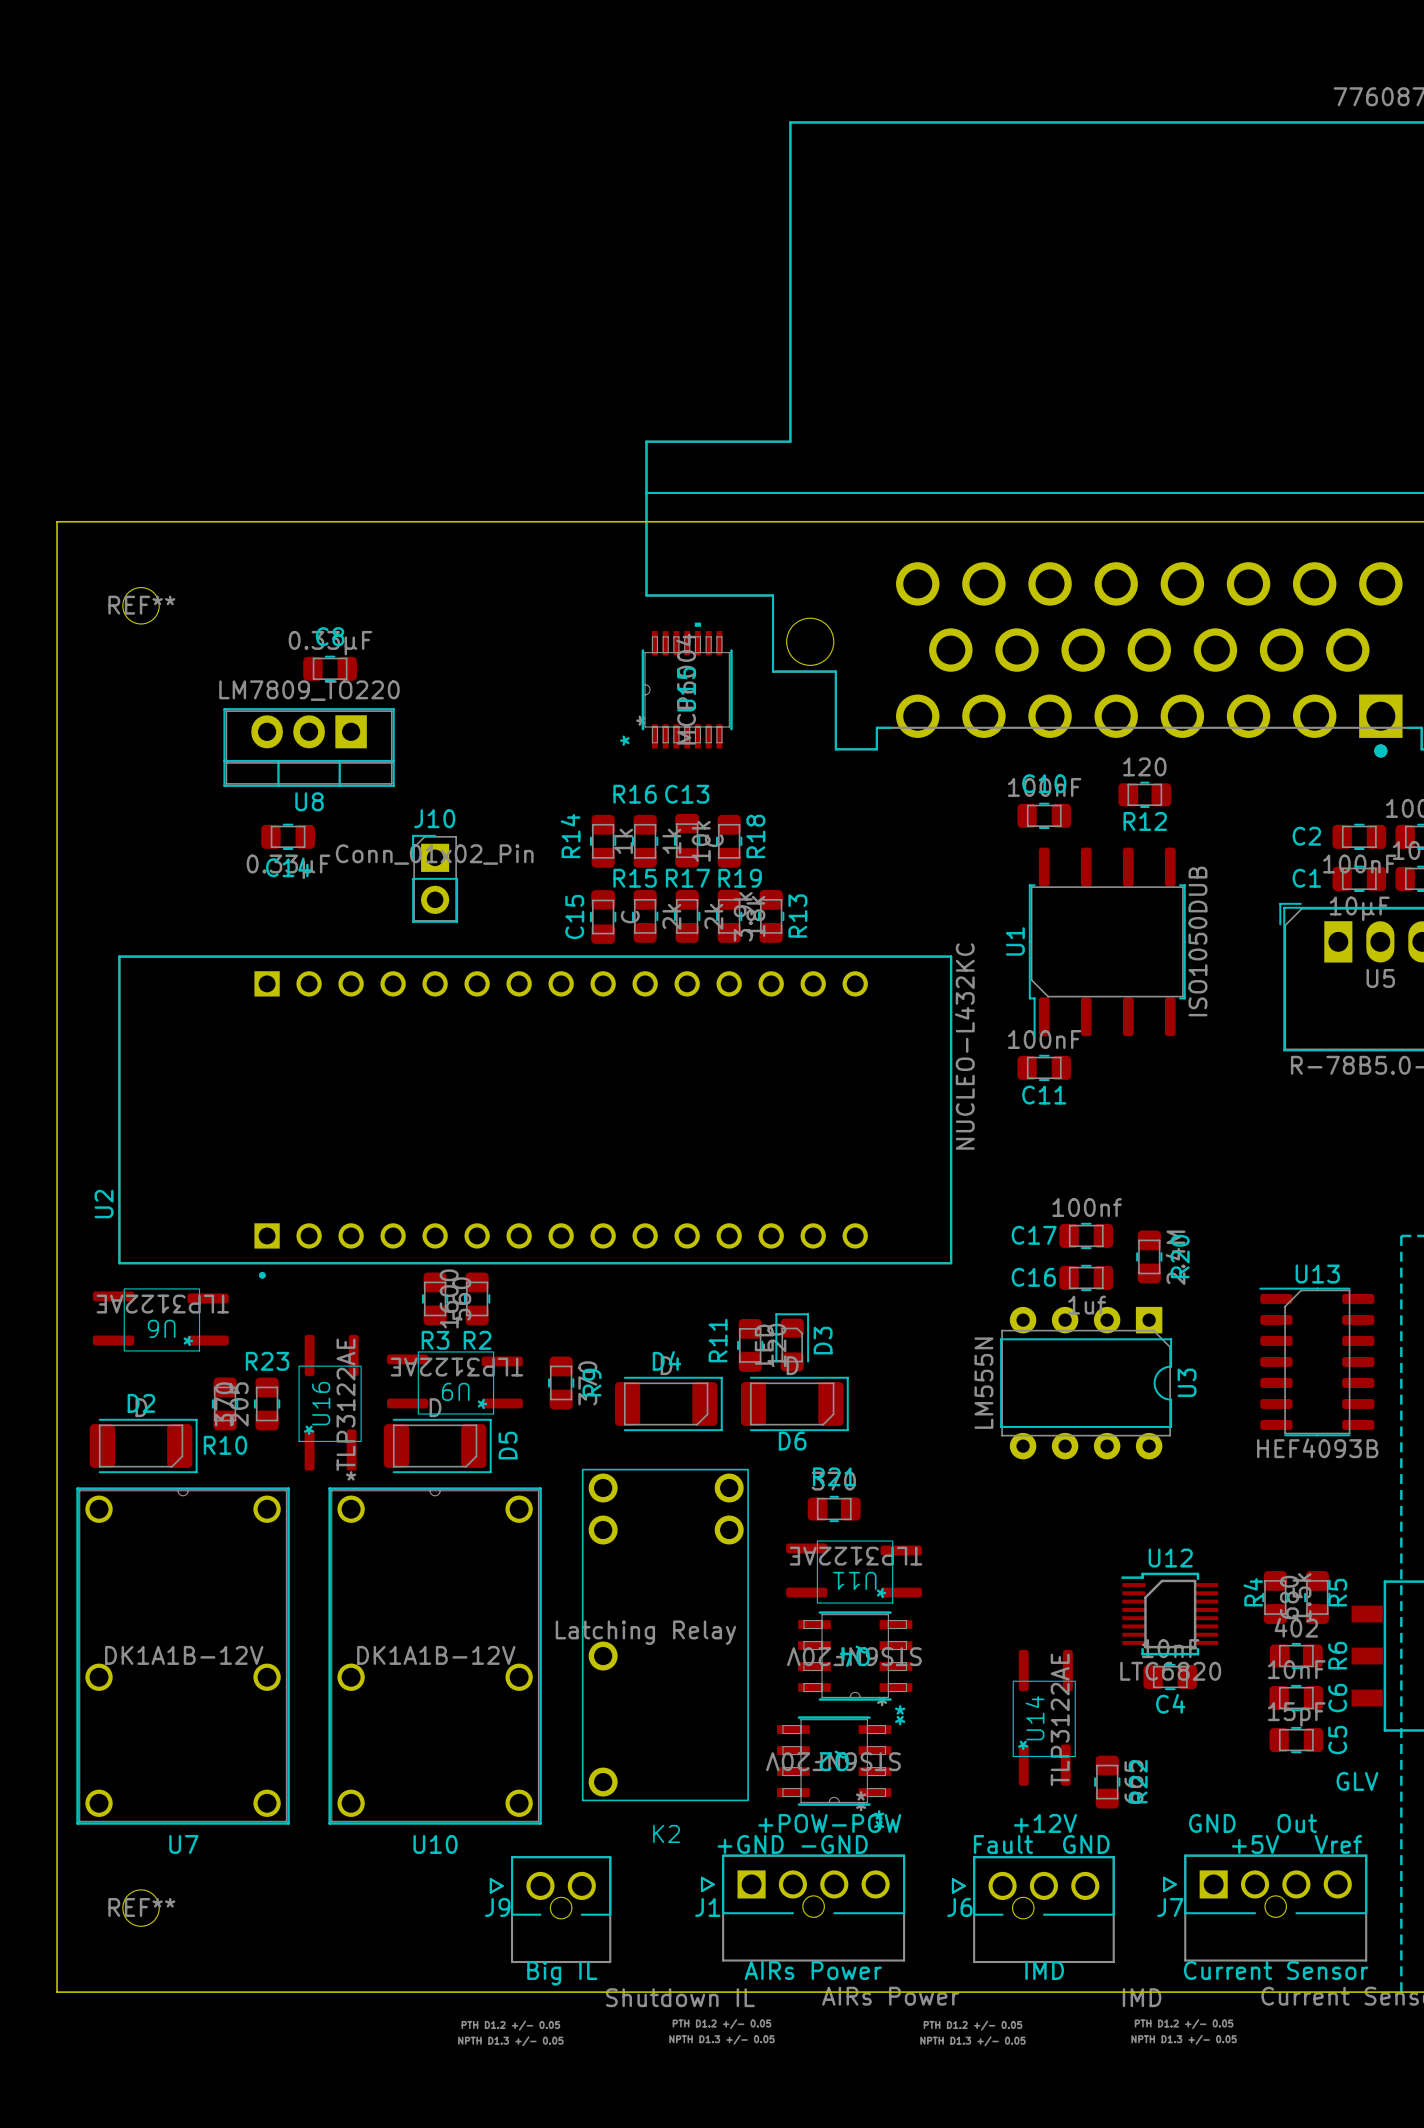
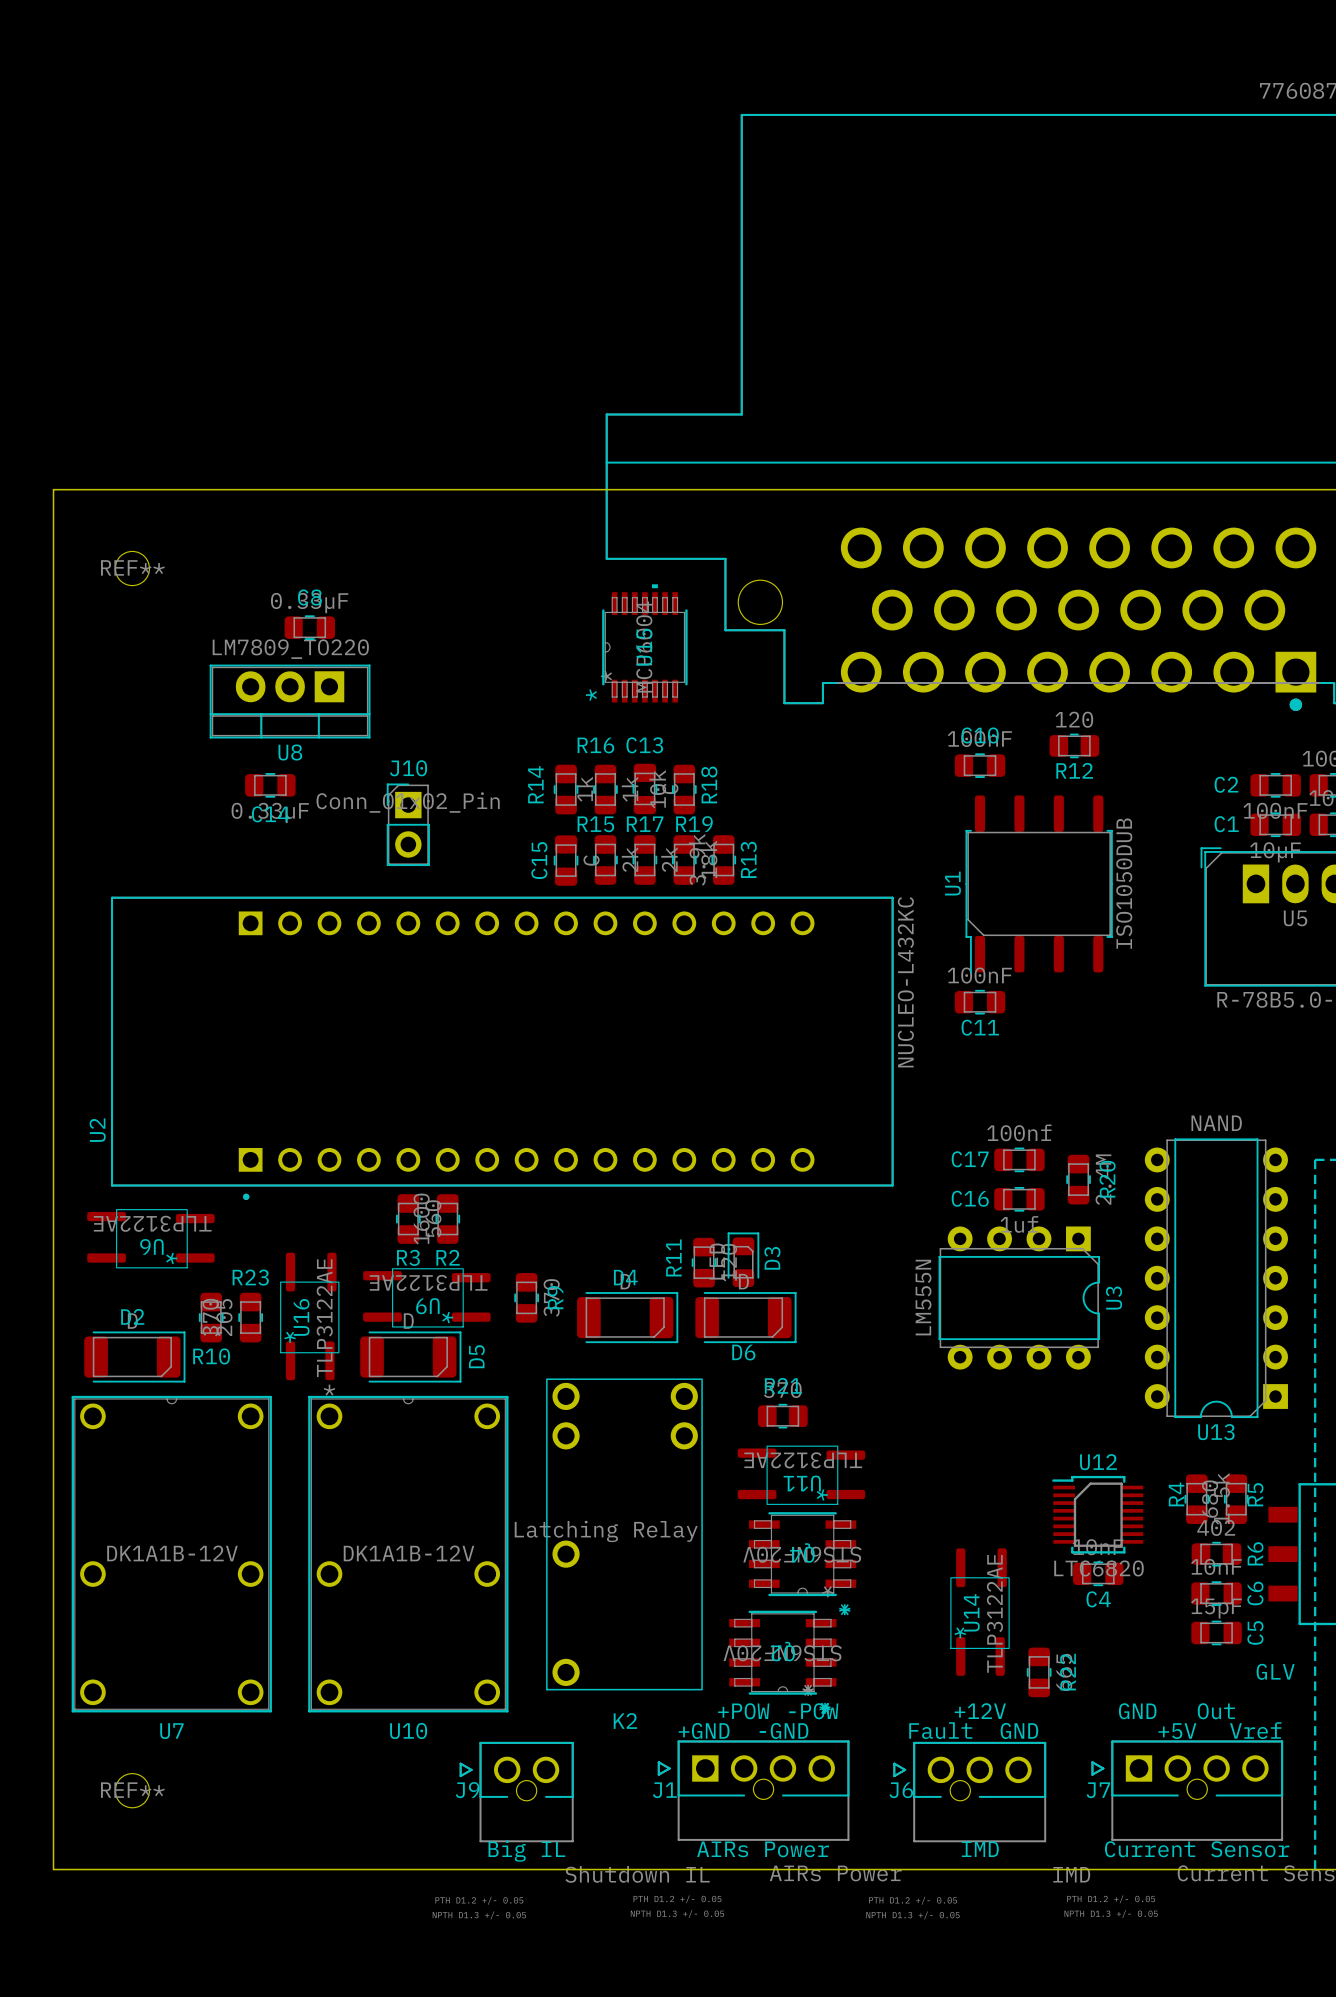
U13 name position: U13 (1317, 1274) -> U13 (1216, 1432)
U13 footprint: [1259, 1287, 1375, 1437] -> [1144, 1138, 1288, 1419]
U13 value: HEF4093B (1317, 1448) -> NAND (1216, 1123)

